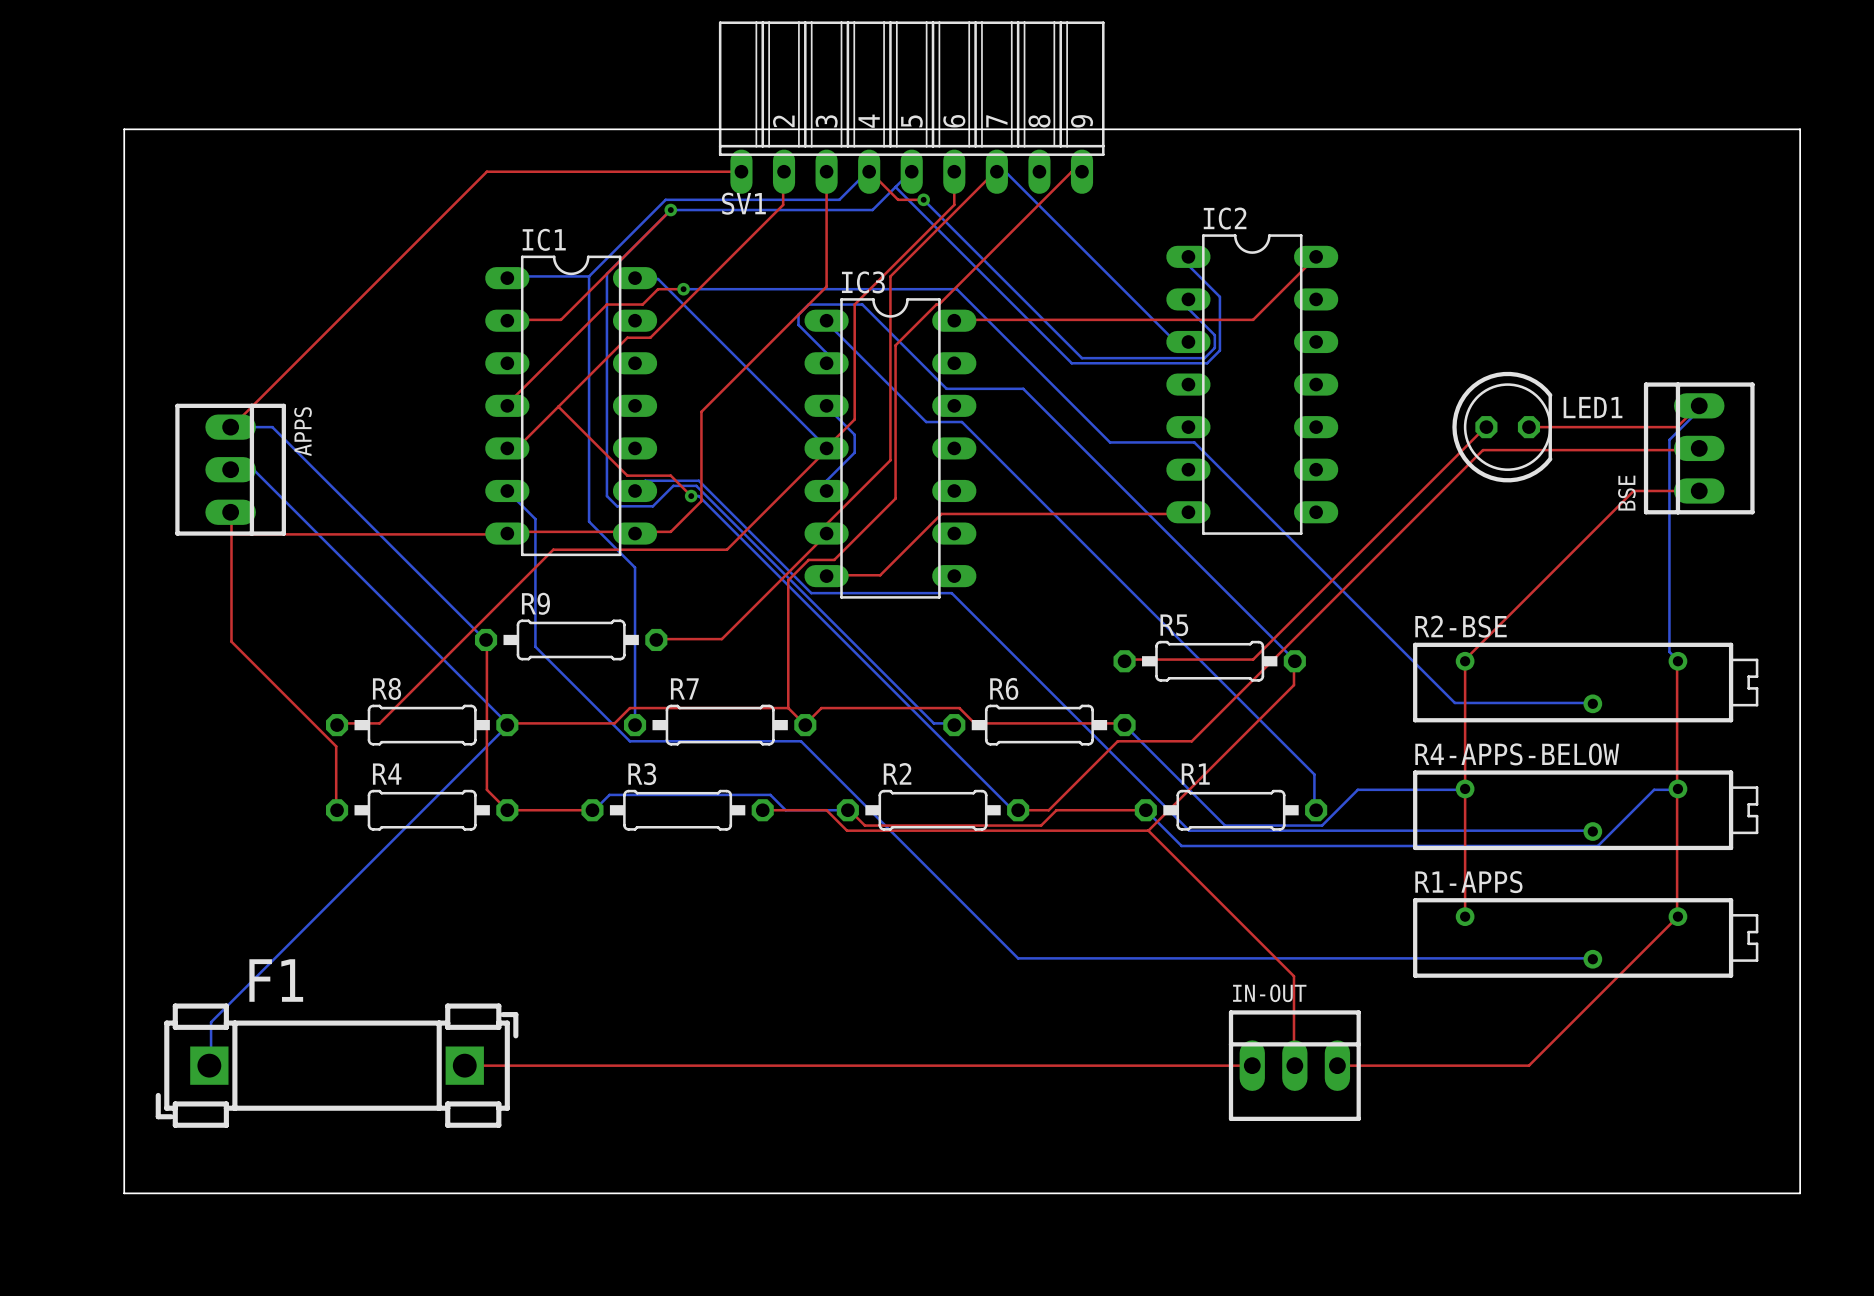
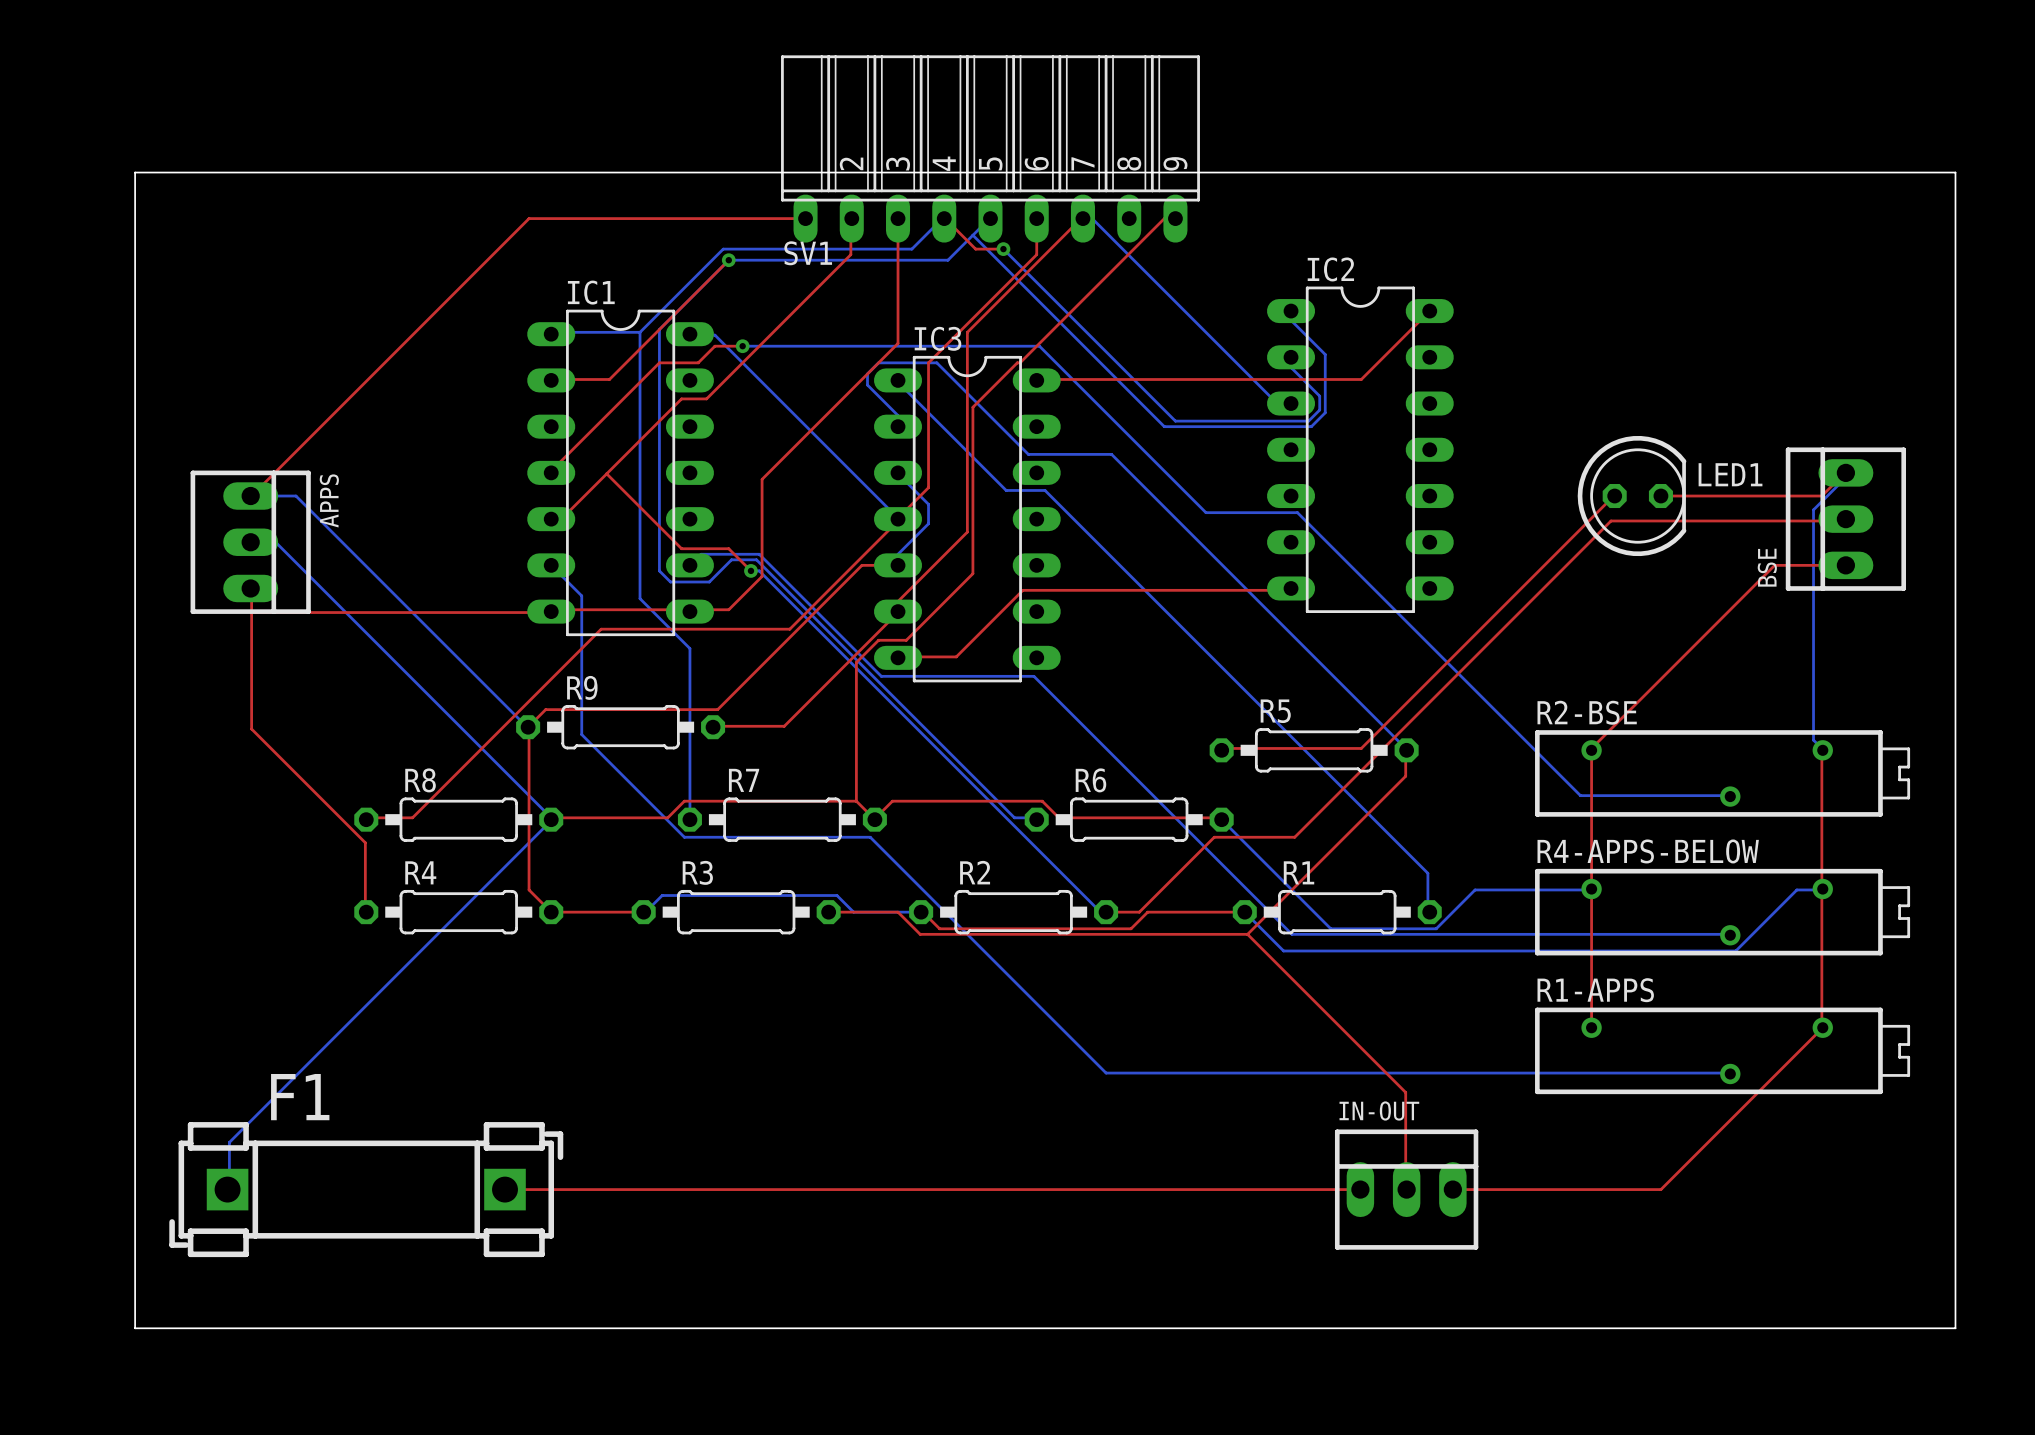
top track: none -> (898, 565) (861, 565) (717, 709) (545, 709) (528, 727)

